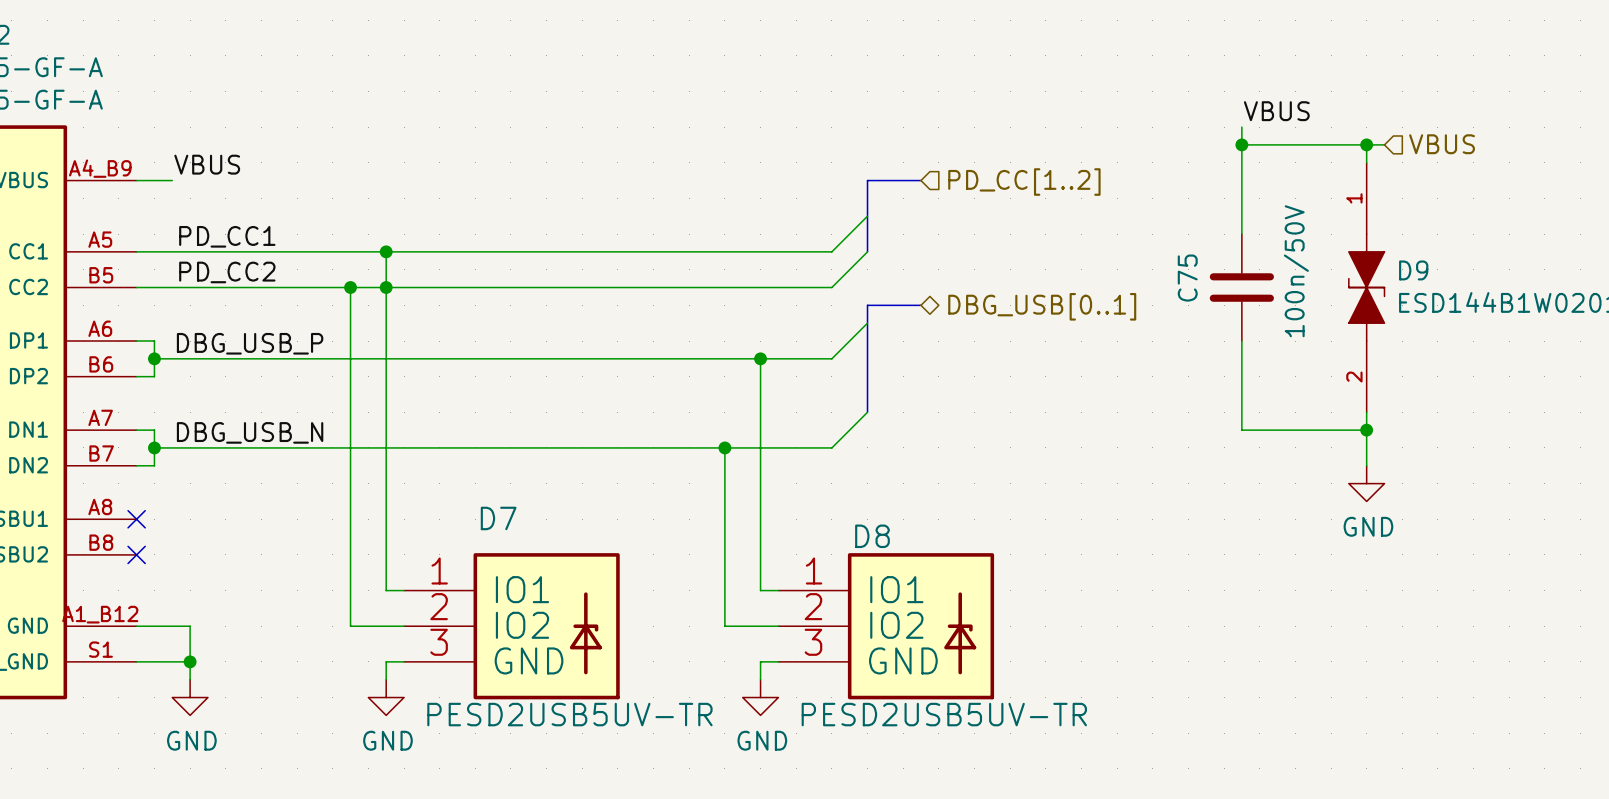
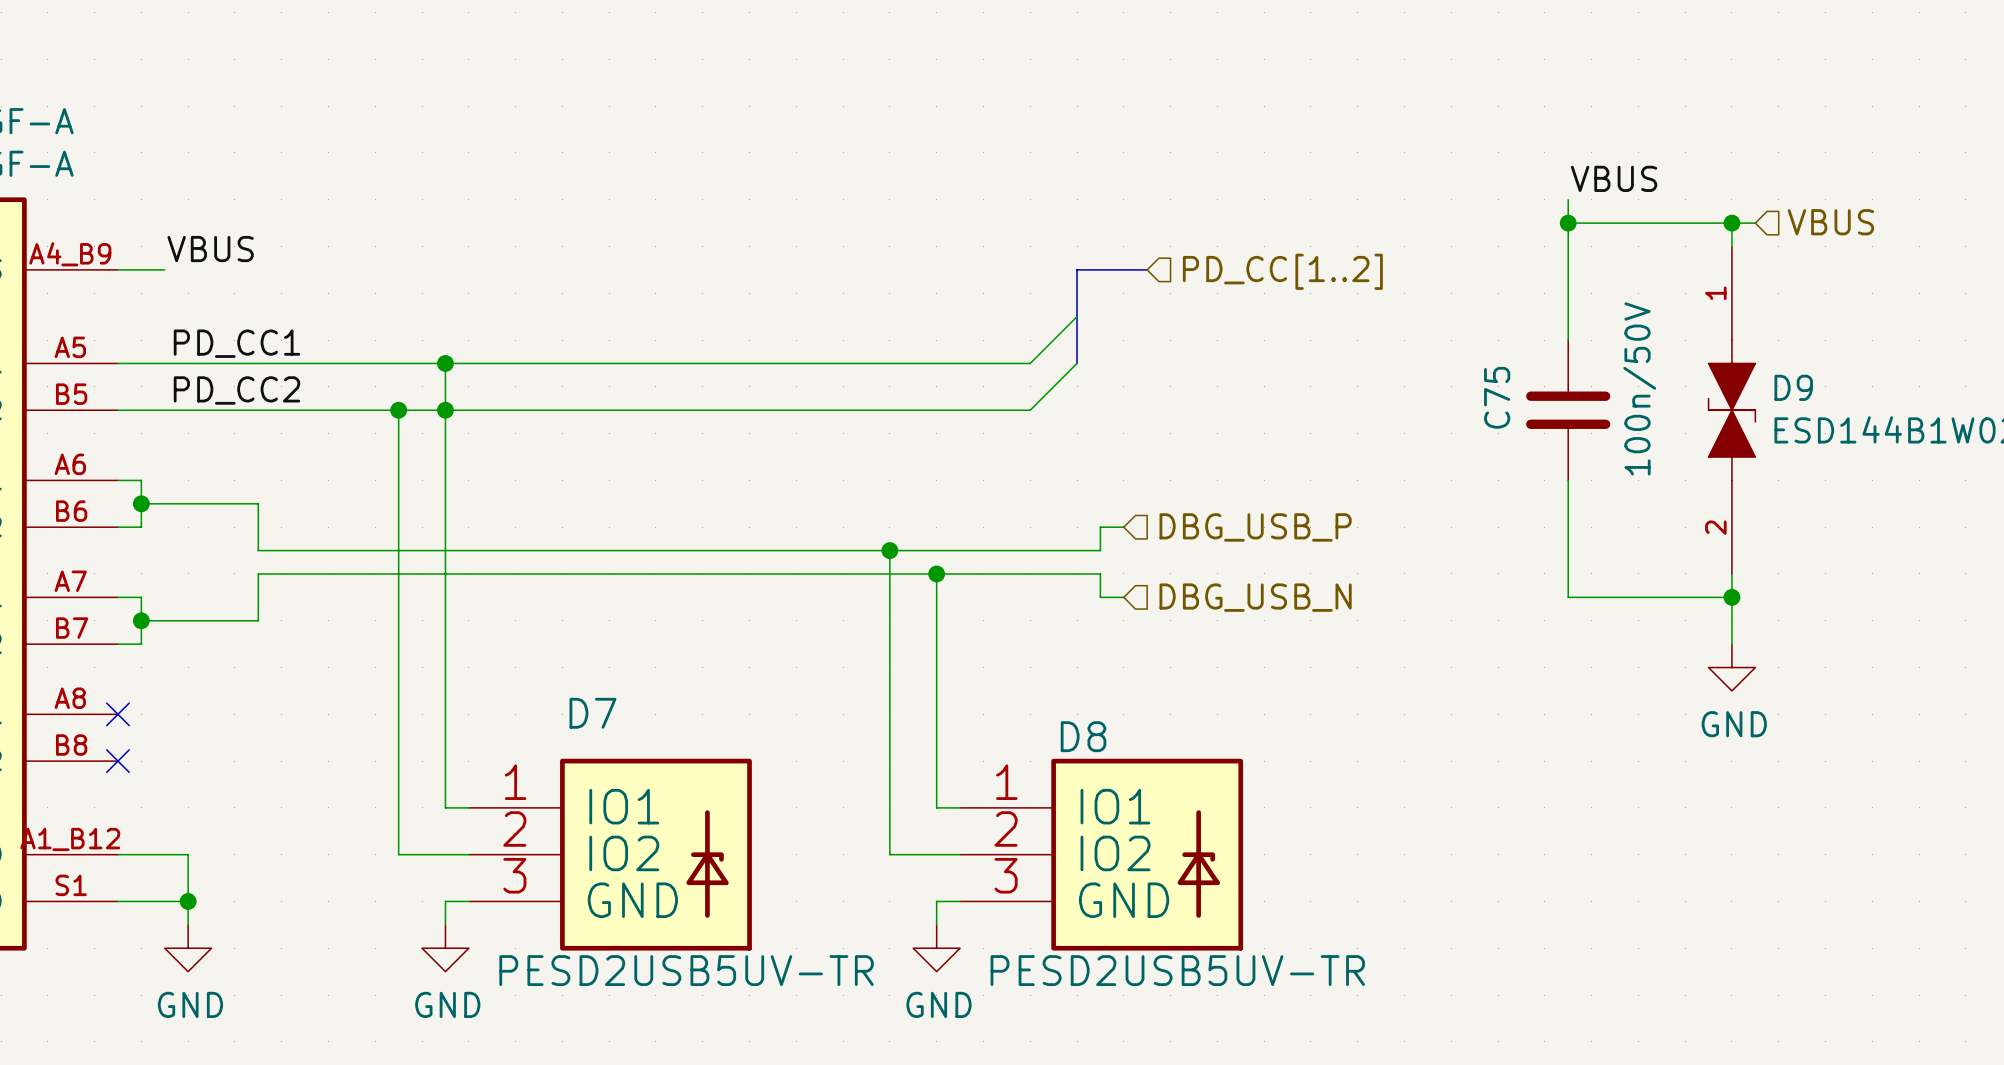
bus: (920, 305) (867, 305) (867, 412) -> none
hierarchical label: DBG_USB[0..1] (1042, 306) -> none
wire: (867, 323) (831, 358) (243, 358) -> (1123, 527) (1100, 527) (1100, 550) (258, 550) (258, 503)
label: DBG_USB_P (250, 343) -> none
wire: (760, 358) (760, 412) -> (889, 550) (889, 620)
junction: (760, 358) -> none
hierarchical label: none -> DBG_USB_P (1255, 527)
junction: none -> (889, 550)
junction: none -> (936, 573)
wire: (867, 412) (831, 447) (243, 447) -> (1123, 597) (1100, 597) (1100, 573) (258, 573) (258, 620)
hierarchical label: none -> DBG_USB_N (1255, 597)
label: DBG_USB_N (250, 432) -> none
junction: (724, 447) -> none

